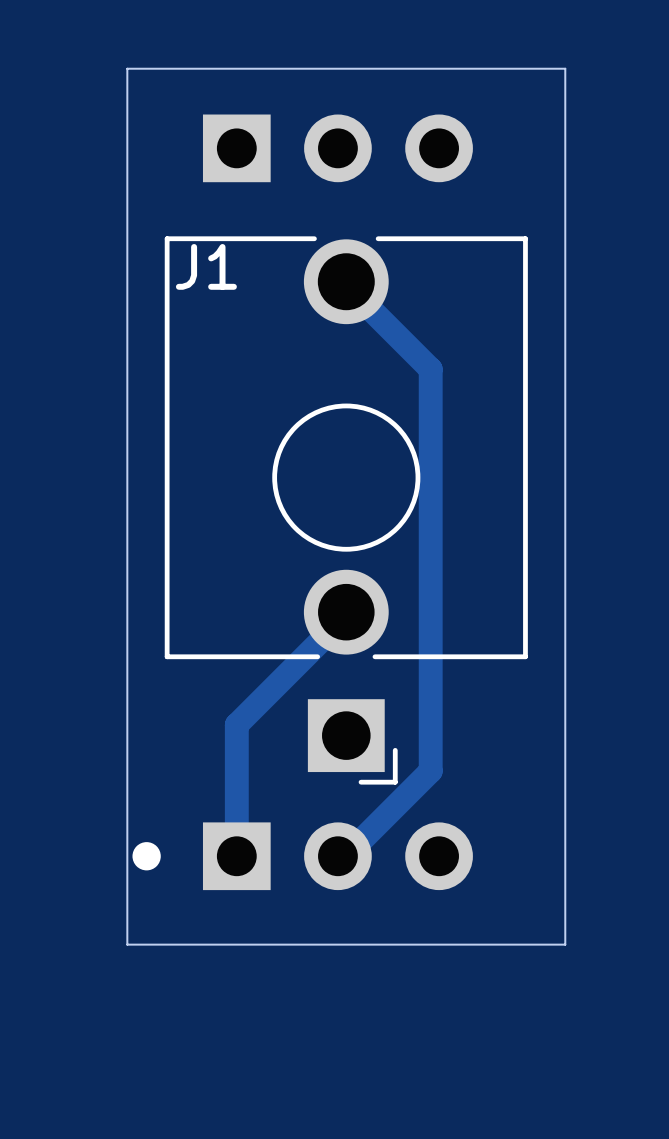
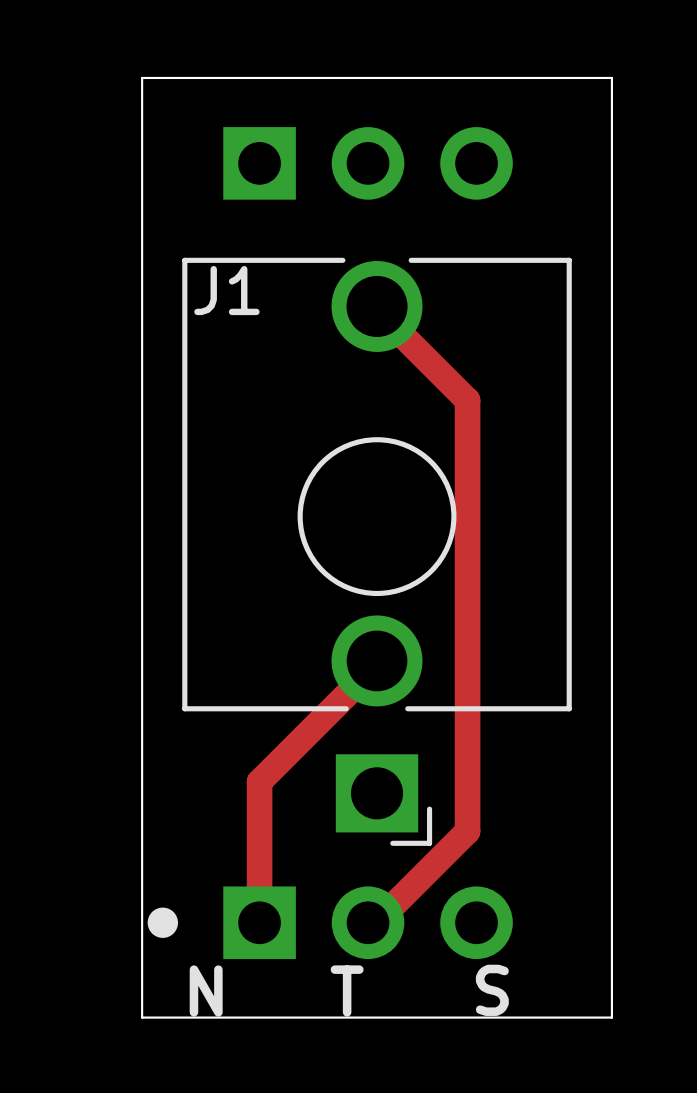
text: none -> N (206, 990)
text: none -> T (347, 990)
text: none -> S (492, 990)

